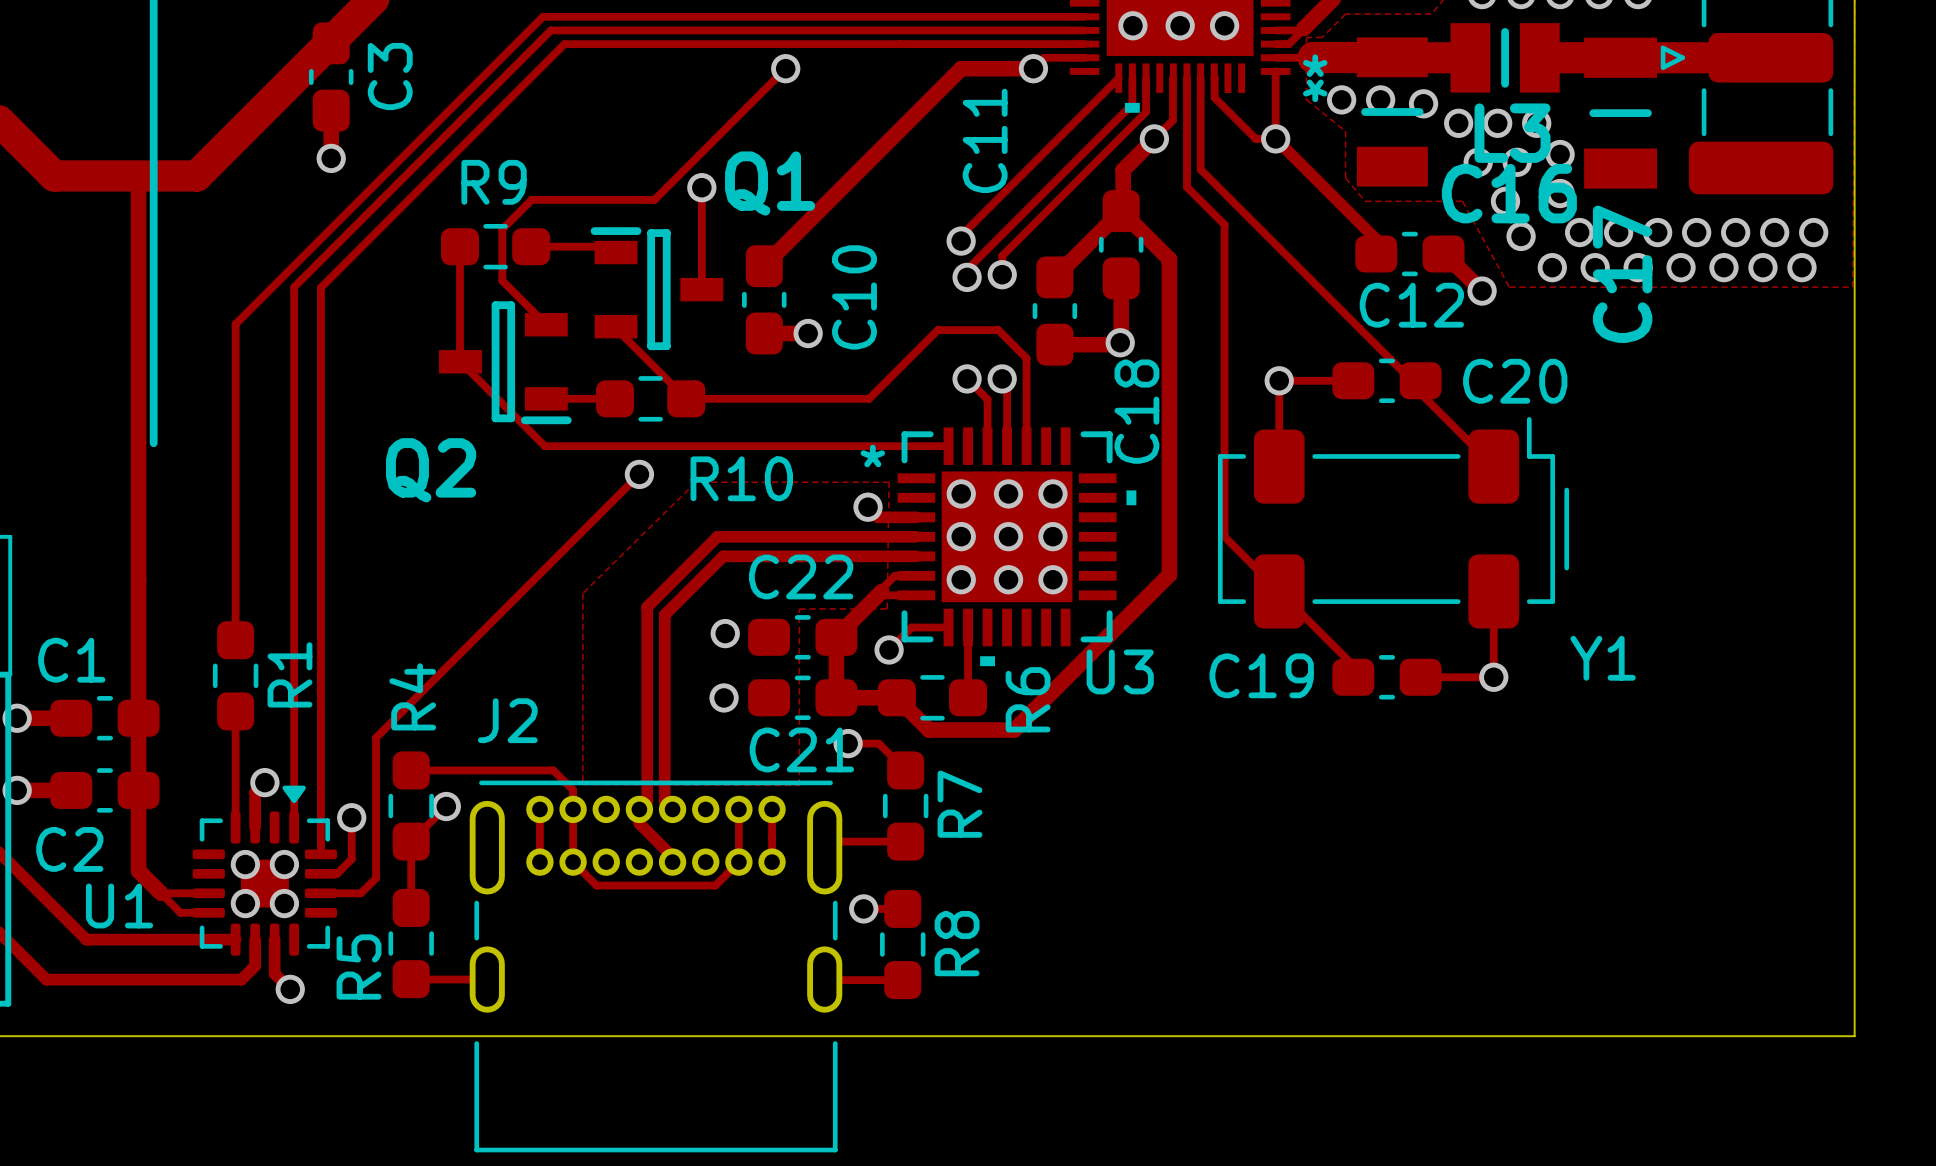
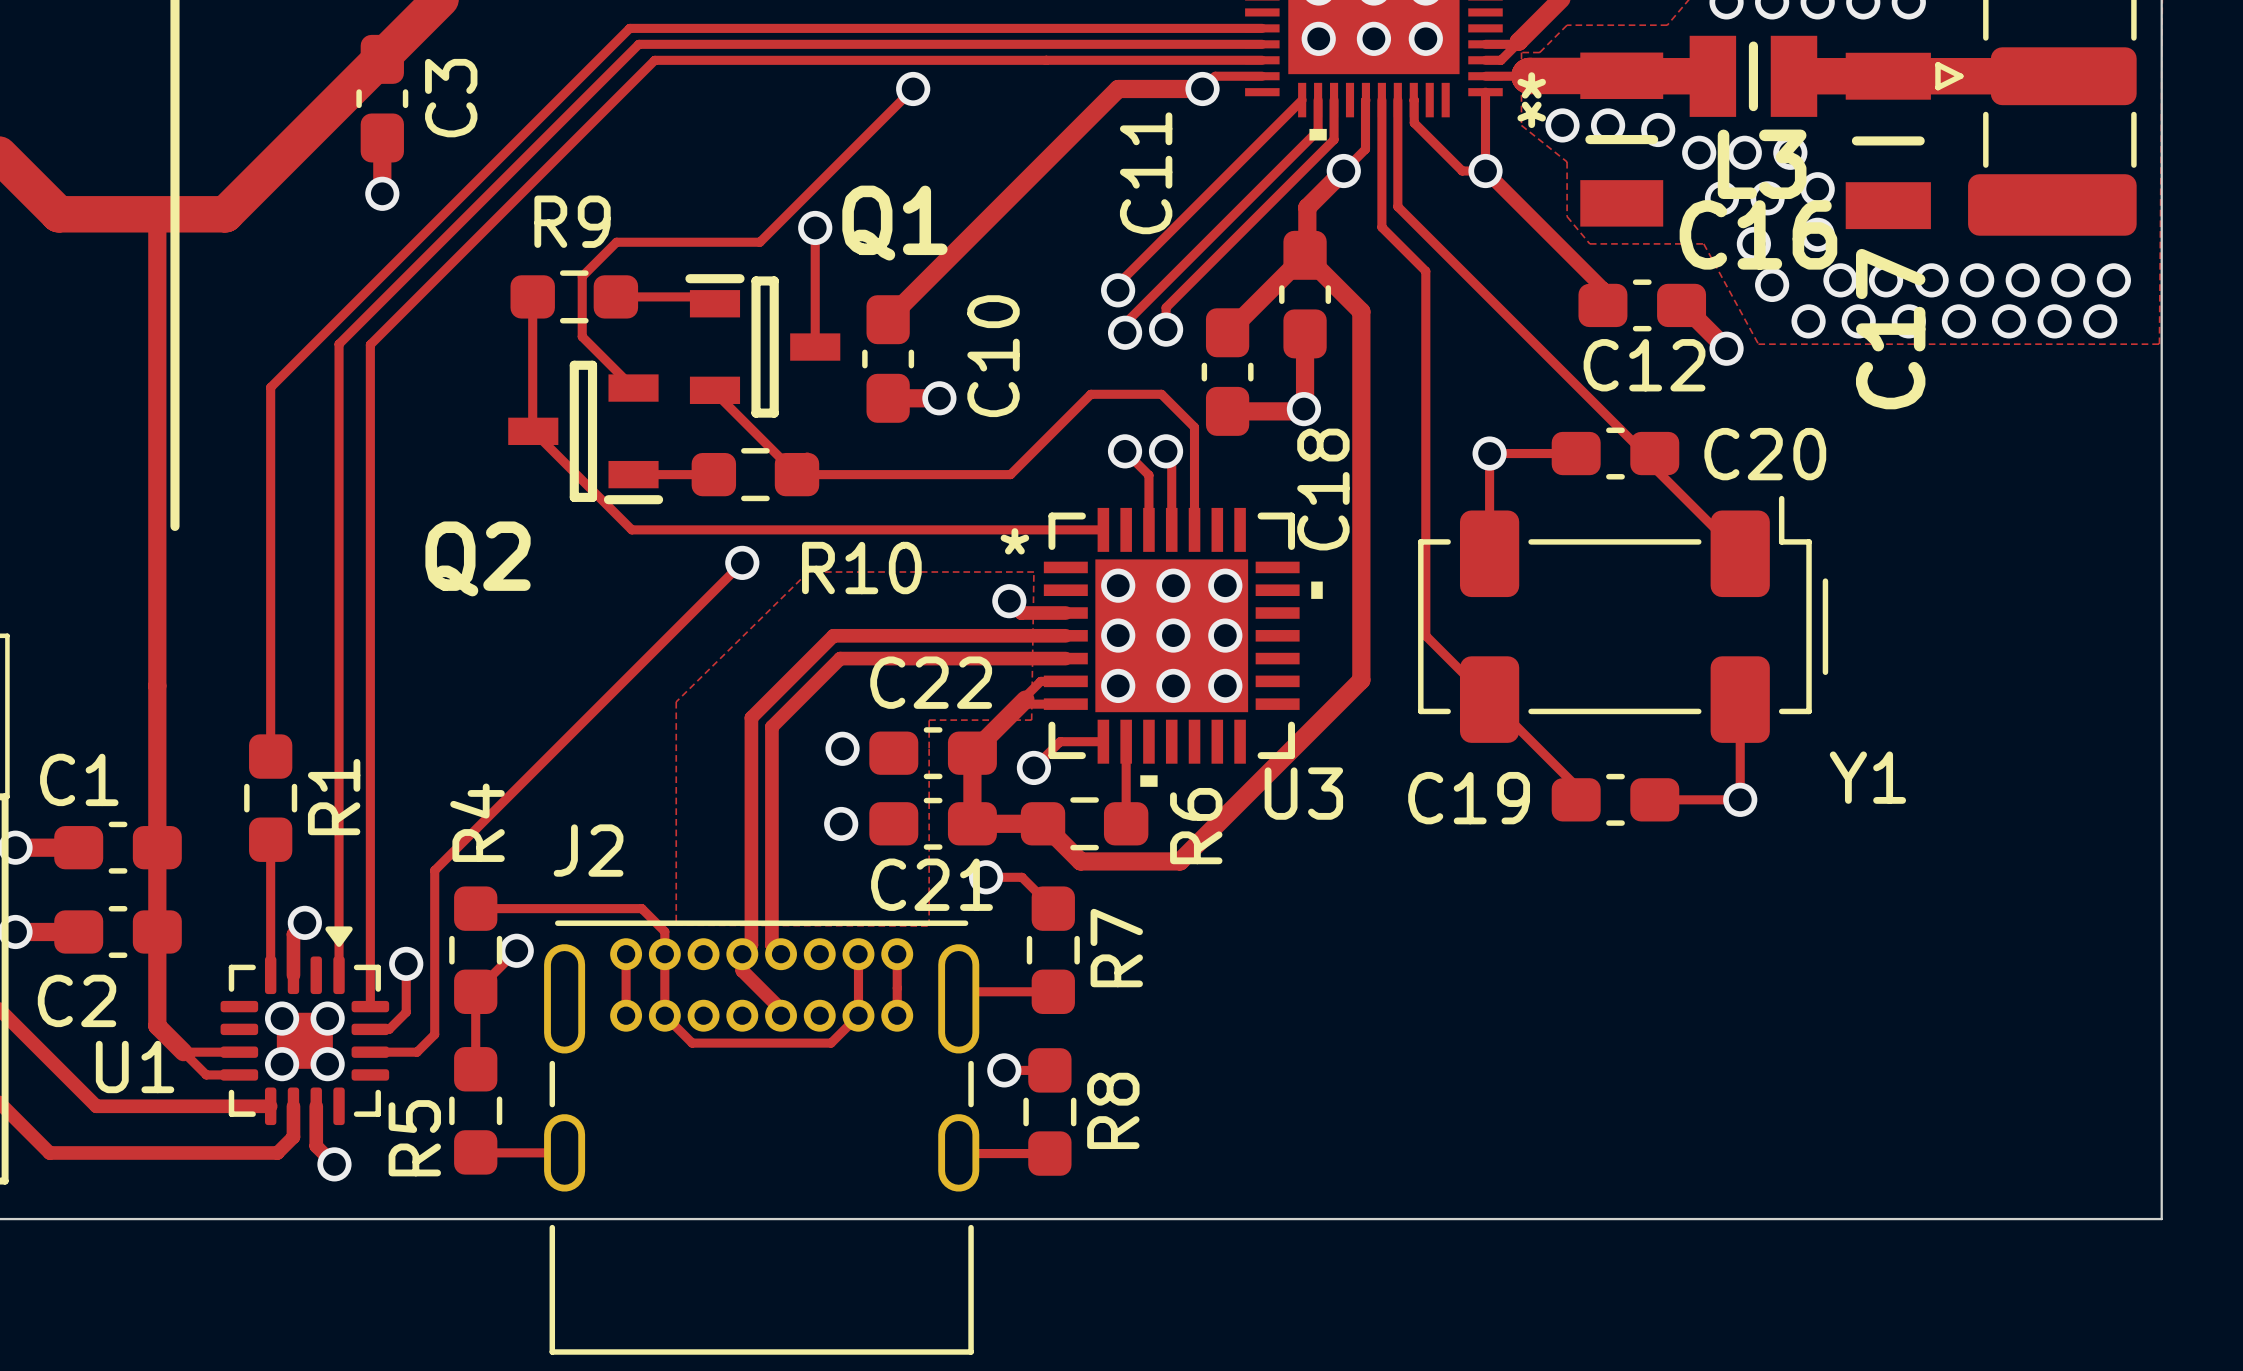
Q2 name position: Q2 (431, 470) -> Q2 (478, 558)

